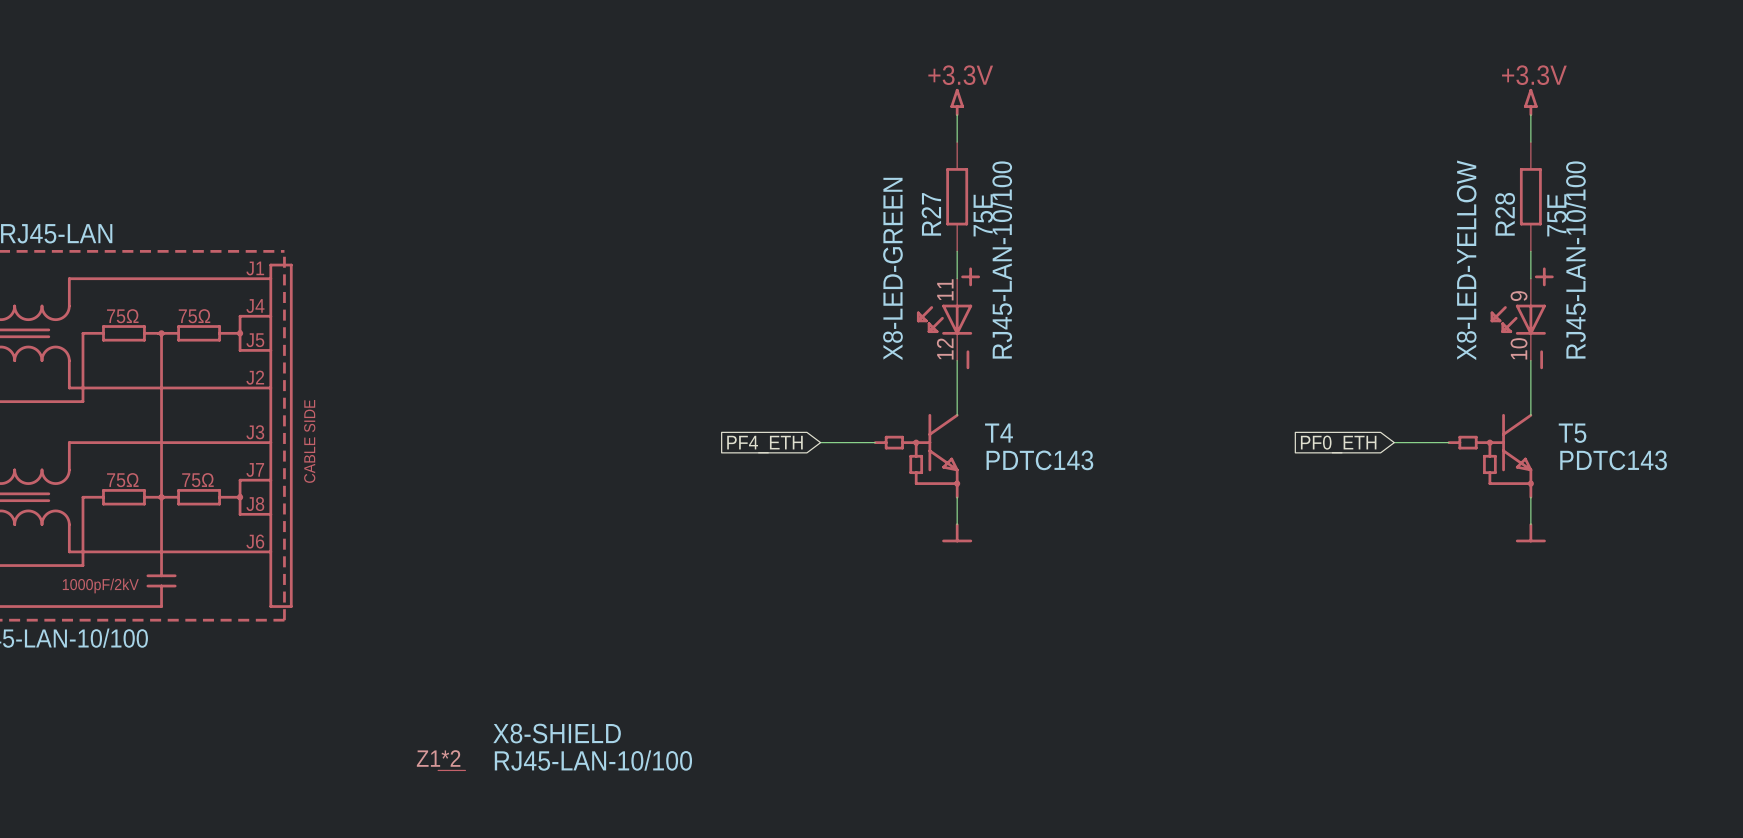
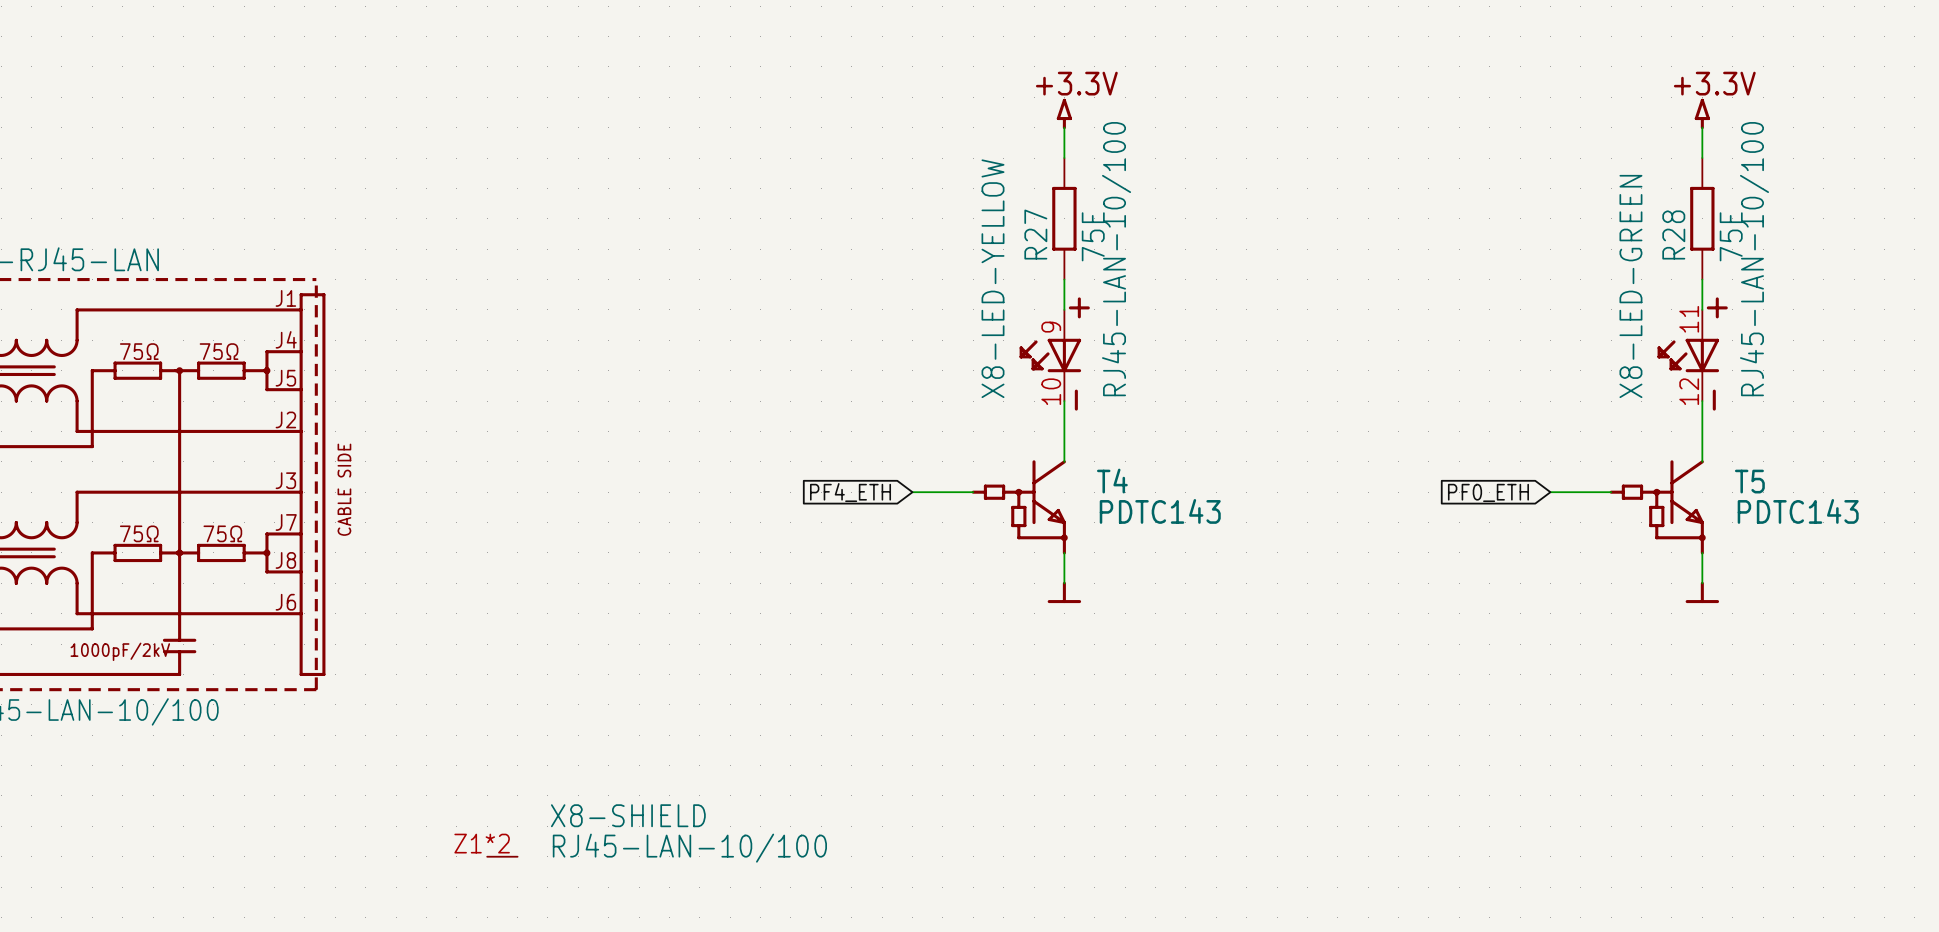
X8-LED-GREEN position: (948, 318) -> (1692, 353)
X8-LED-YELLOW position: (1522, 318) -> (1054, 353)

